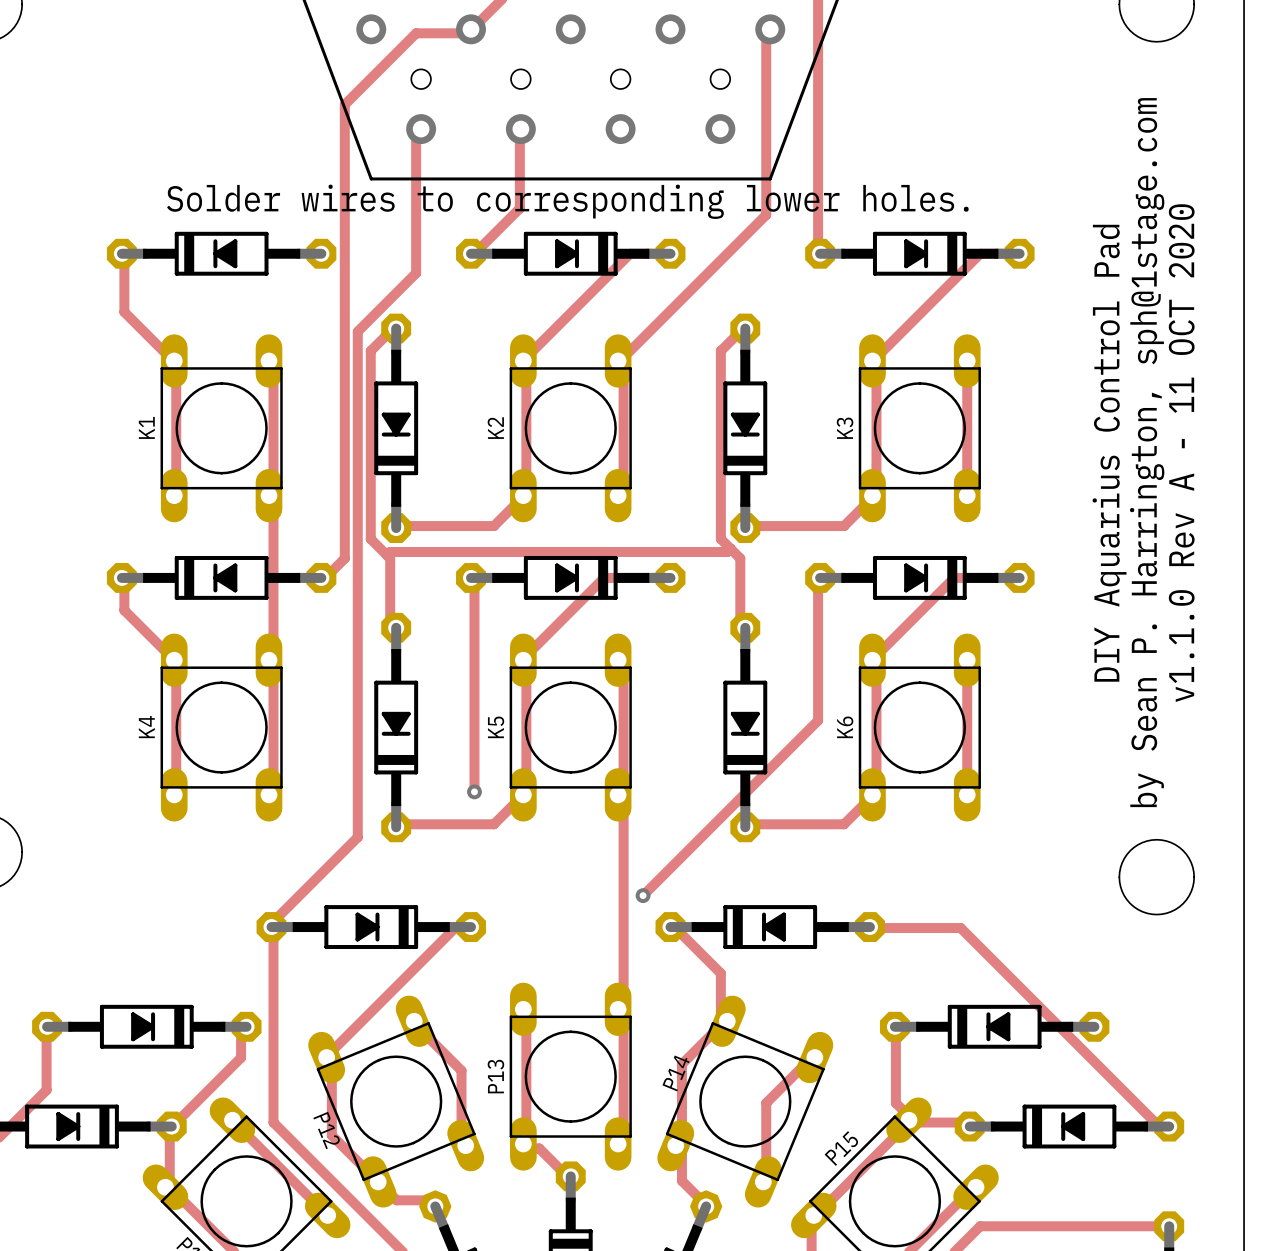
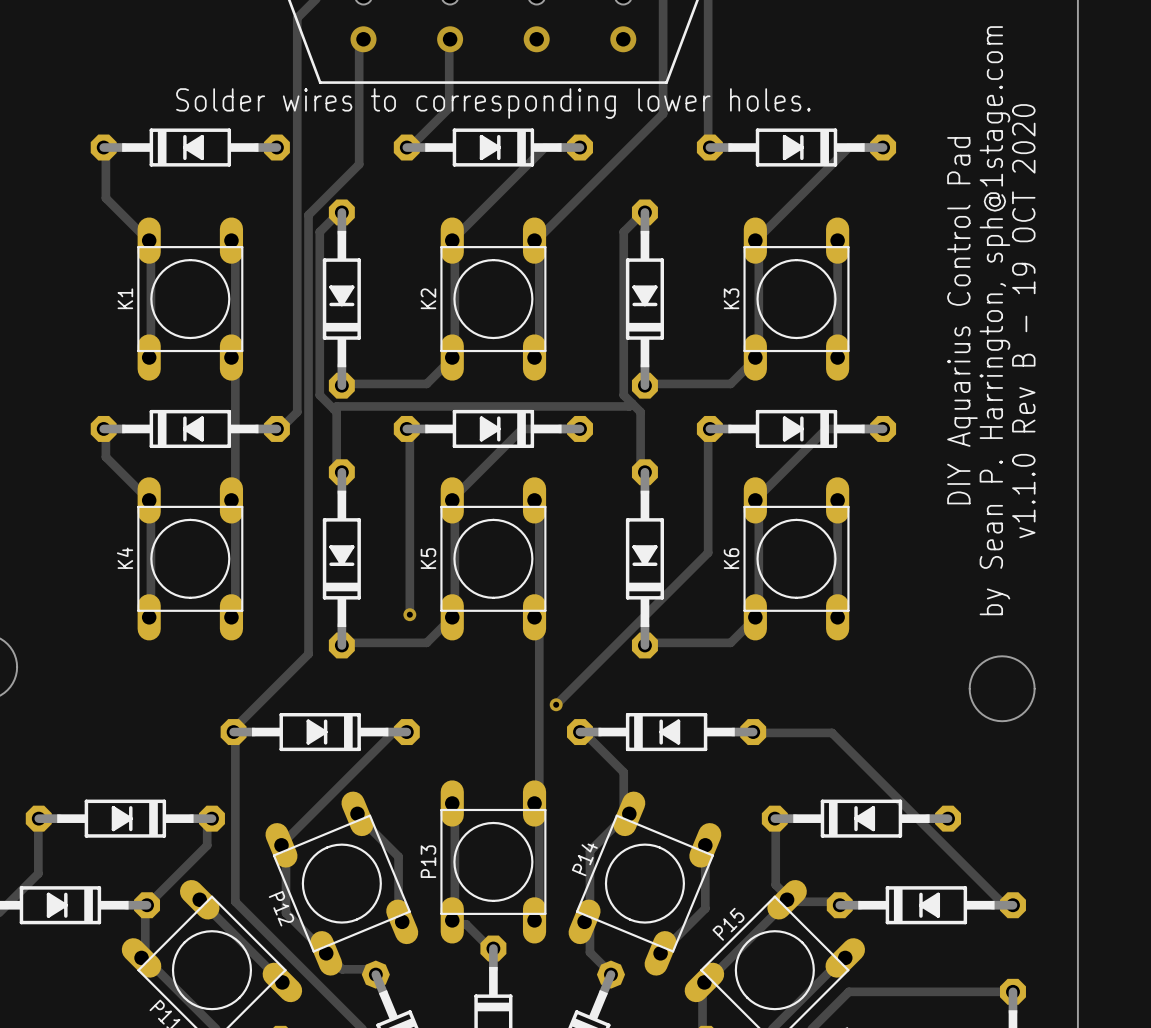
text: v1.1.0 Rev A - 11 OCT 2020 (1181, 453) -> v1.1.0 Rev B - 19 OCT 2020 (1023, 321)
track: (814, 1057) (811, 1057) (766, 1103) (766, 1180) (763, 1181) -> (705, 845) (705, 908) (660, 953)

